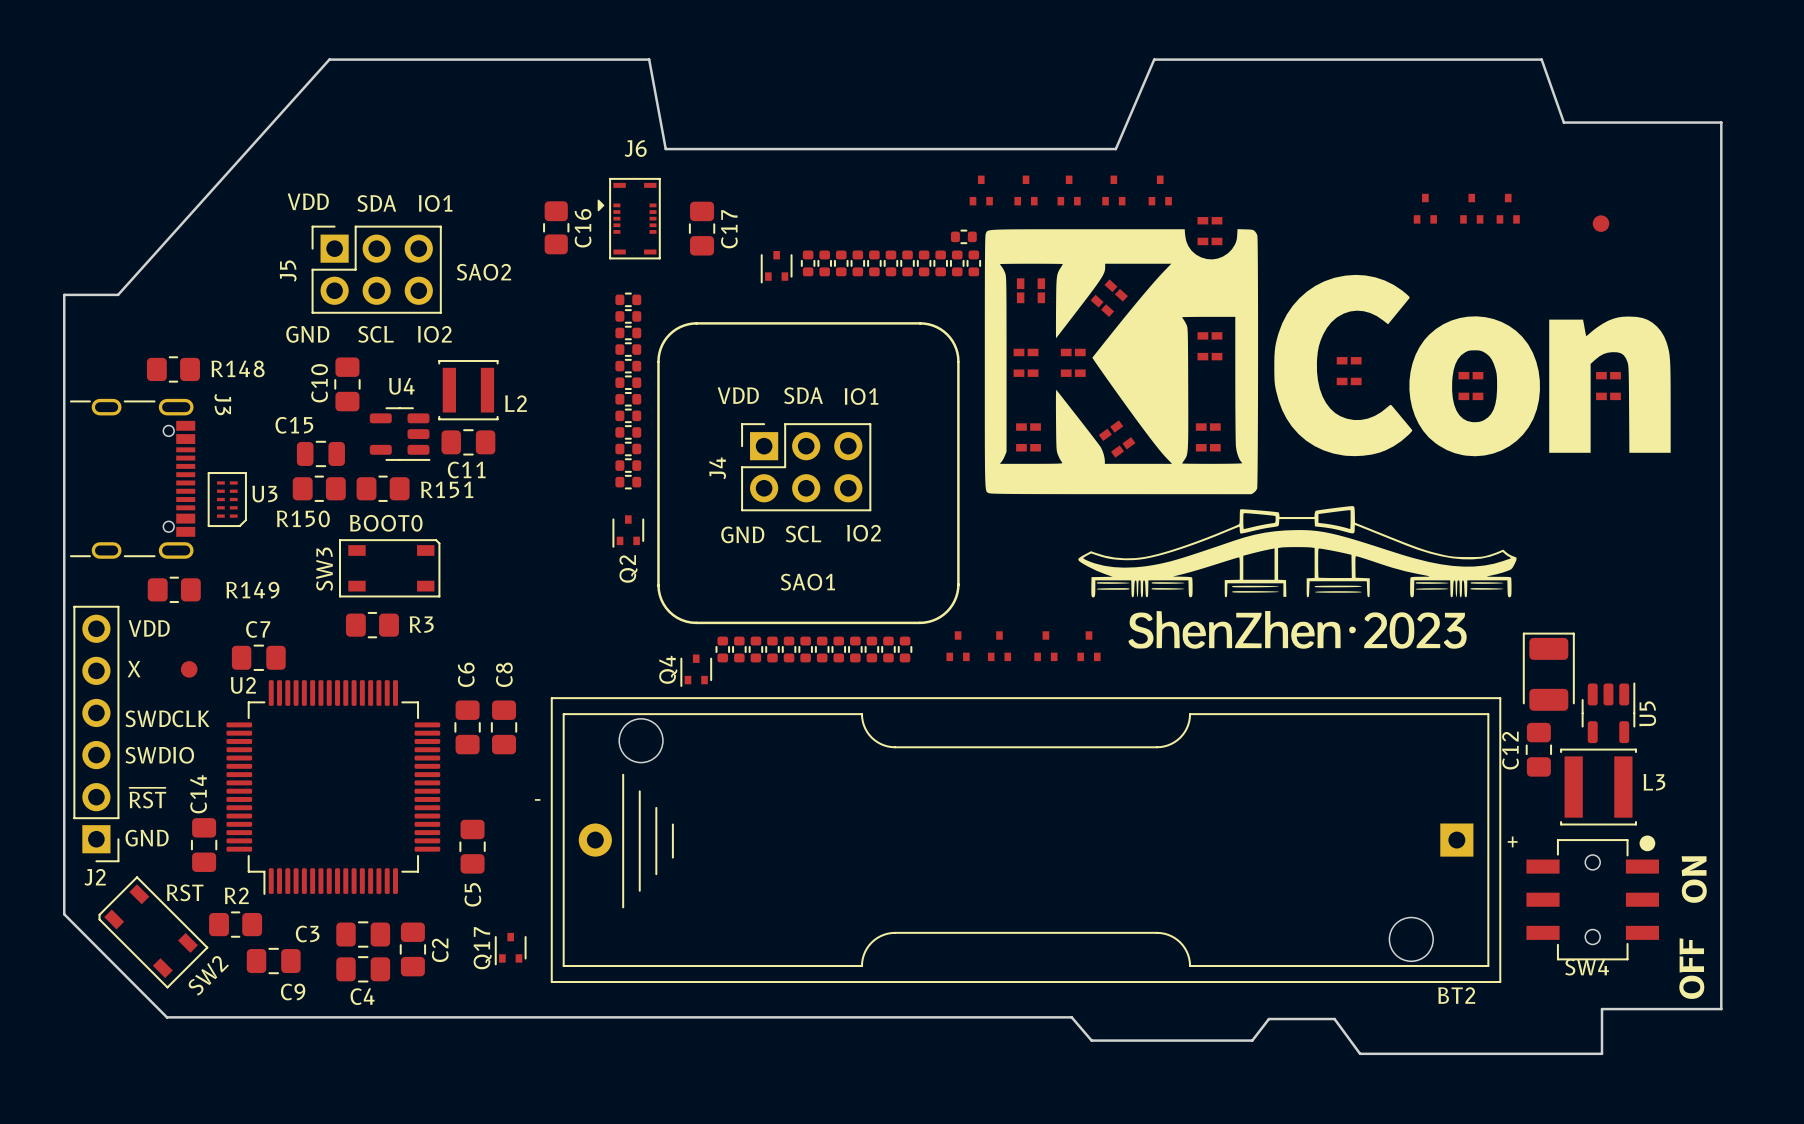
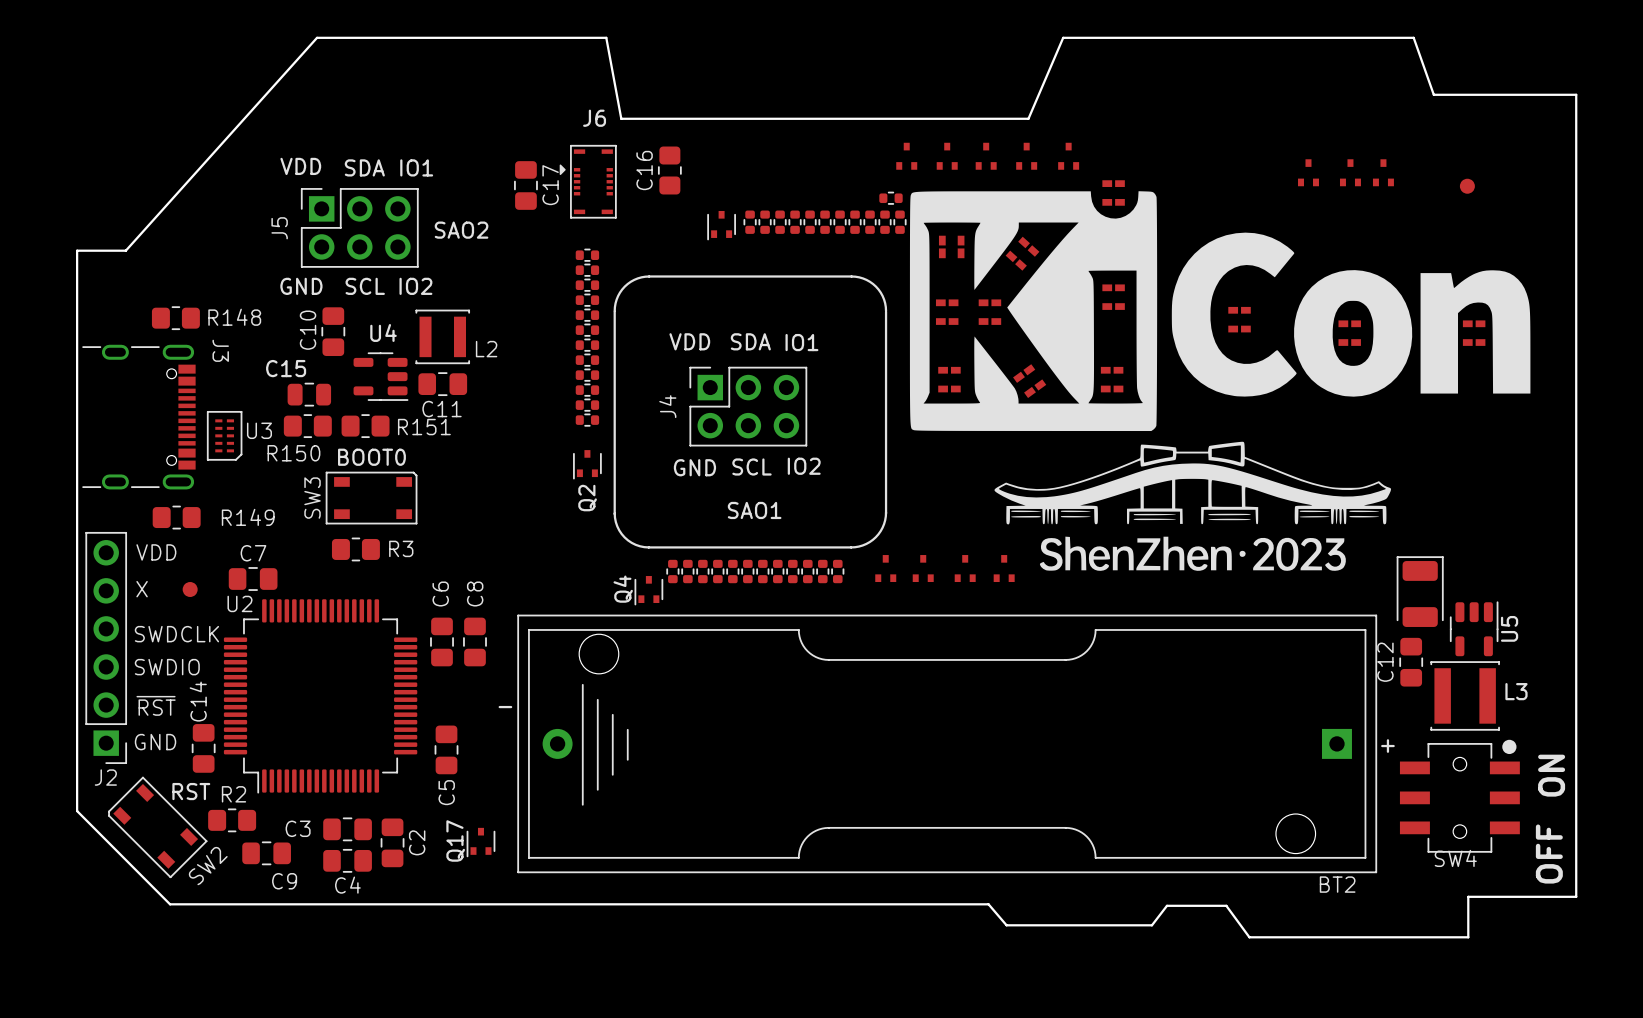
C16 position: (556, 227) -> (669, 170)
C16 name position: C16 (583, 228) -> C16 (644, 170)
C17 position: (702, 228) -> (525, 185)

